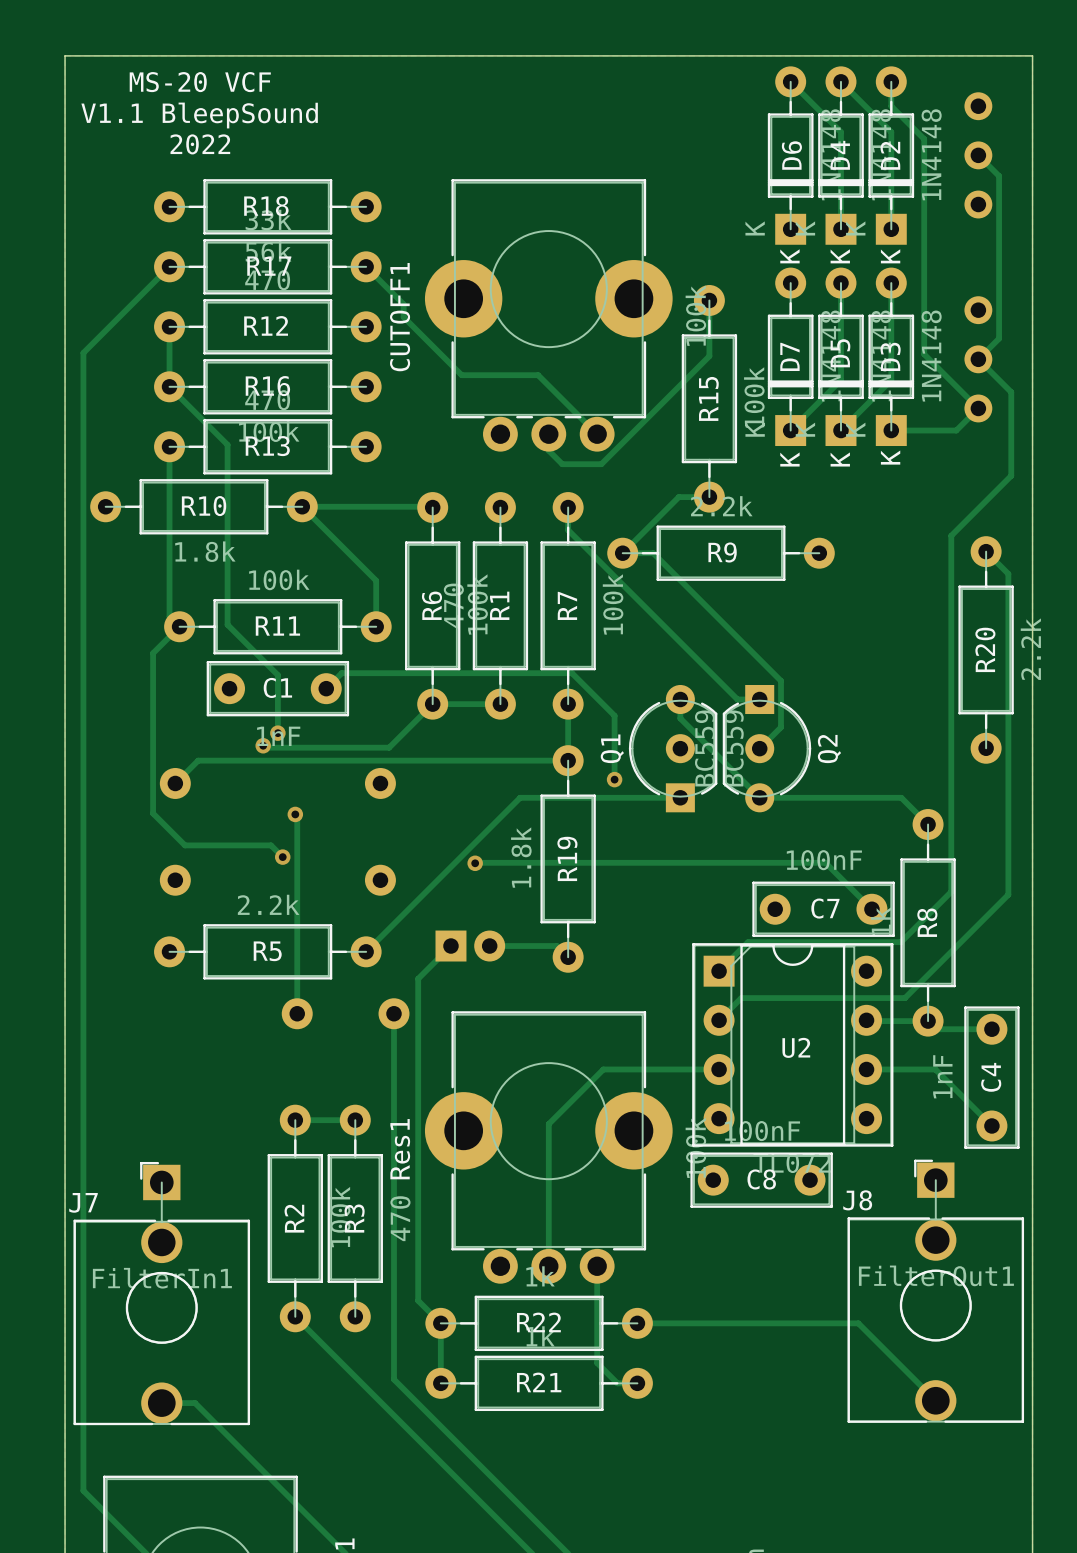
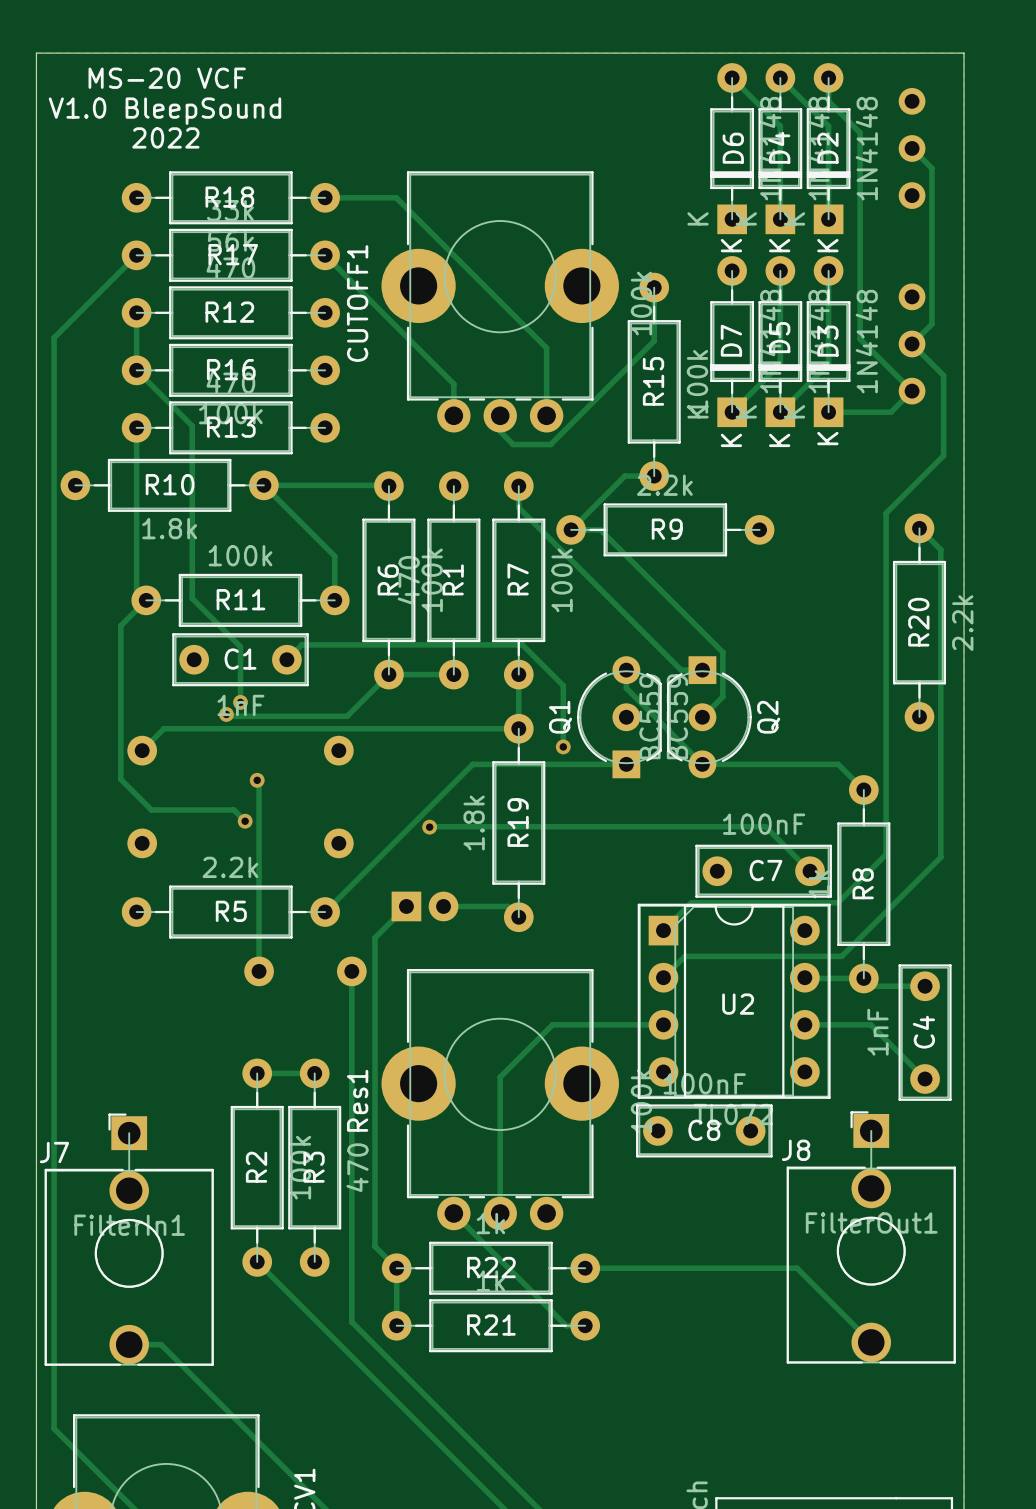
text: V1.1 BleepSound (199, 115) -> V1.0 BleepSound (164, 111)
track: none -> (325, 197) (396, 197) (546, 348) (546, 415)
track: (403, 304) (403, 317) (461, 375) (538, 375) (597, 434) -> (361, 291) (453, 384) (453, 415)
track: (597, 1266) (597, 1363) -> (453, 1213) (546, 1306)

